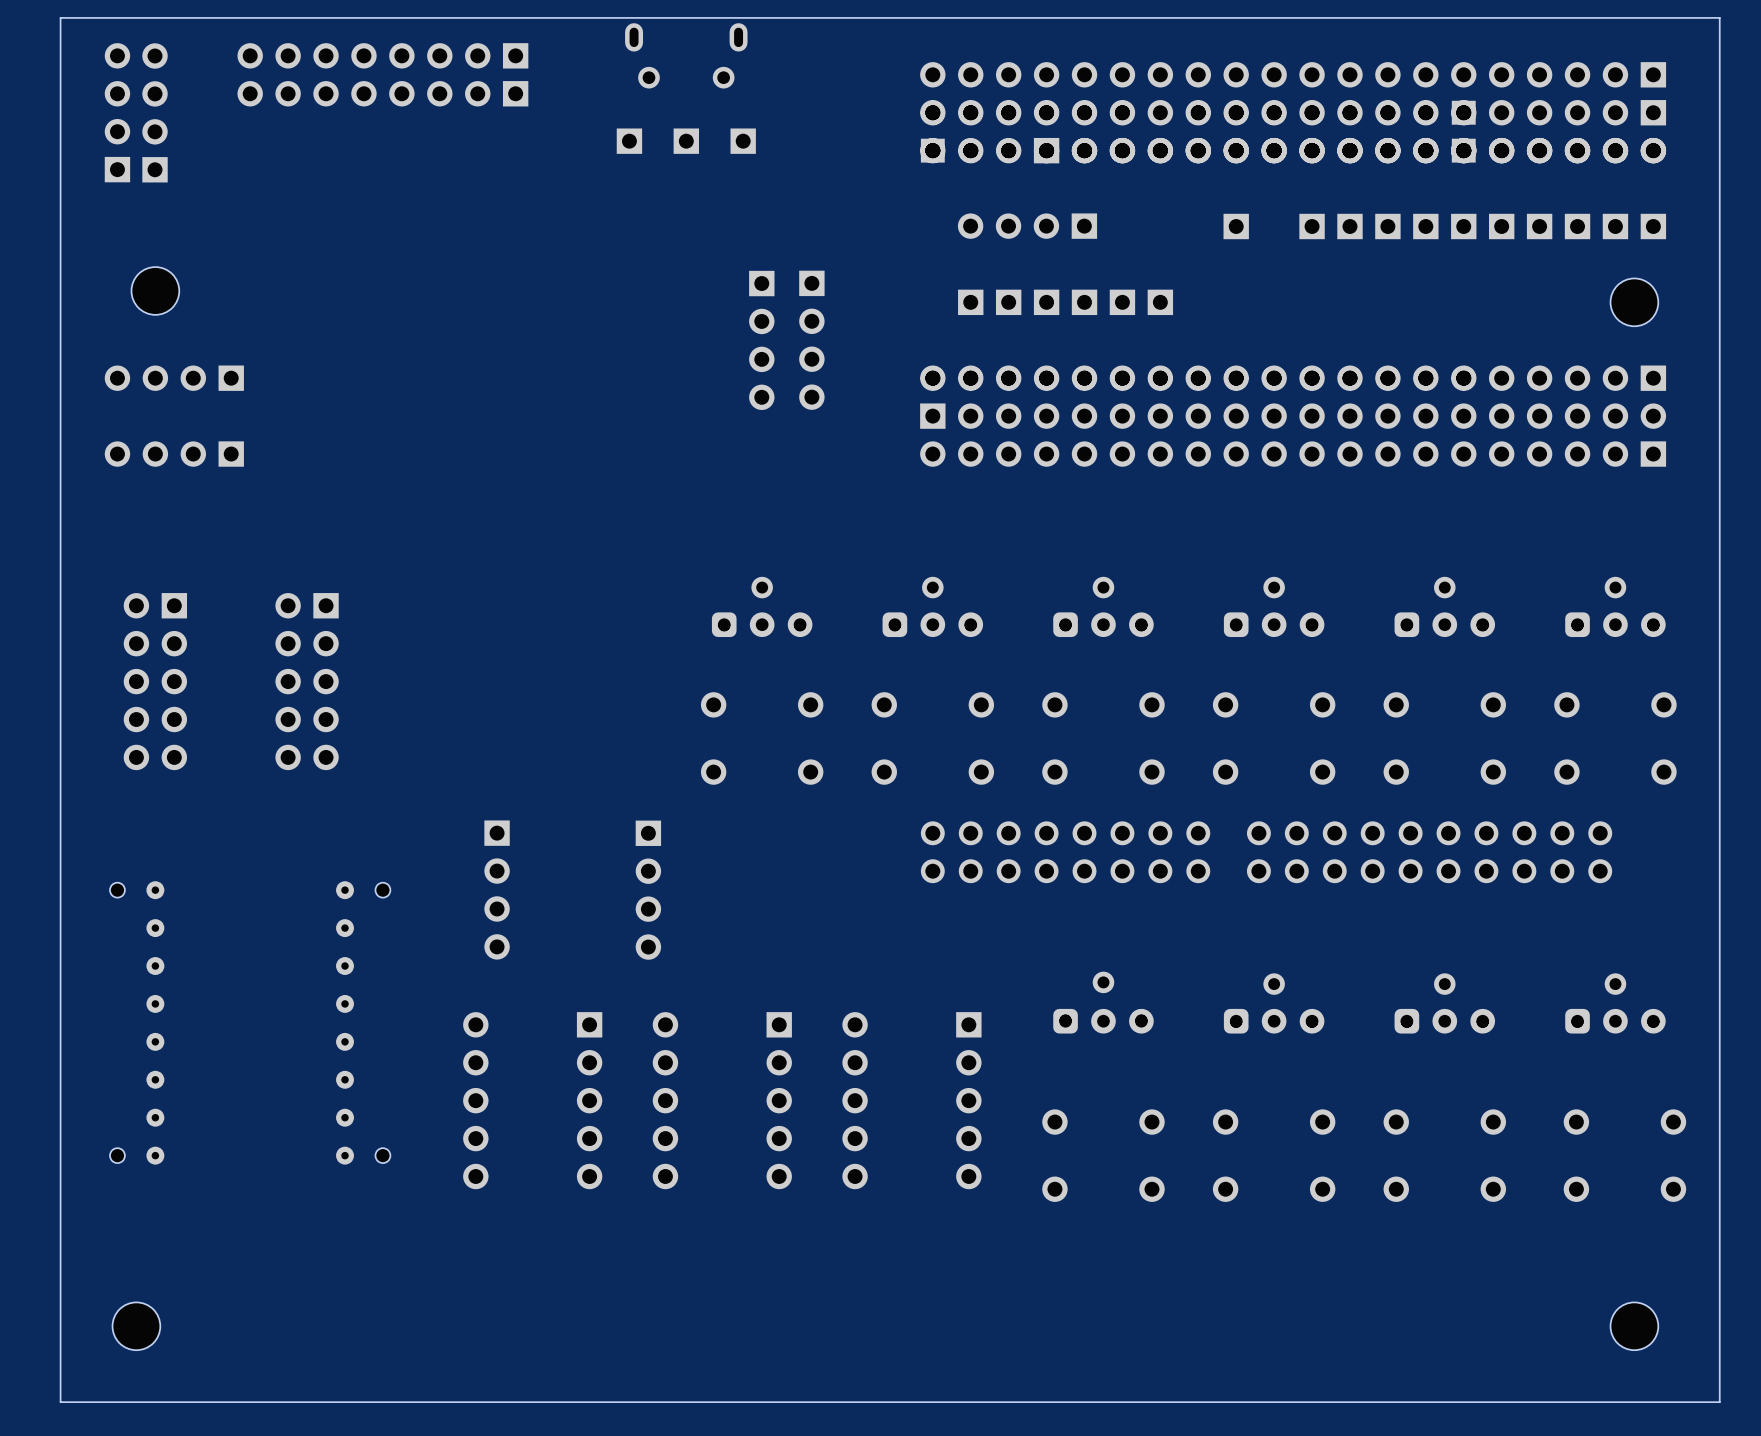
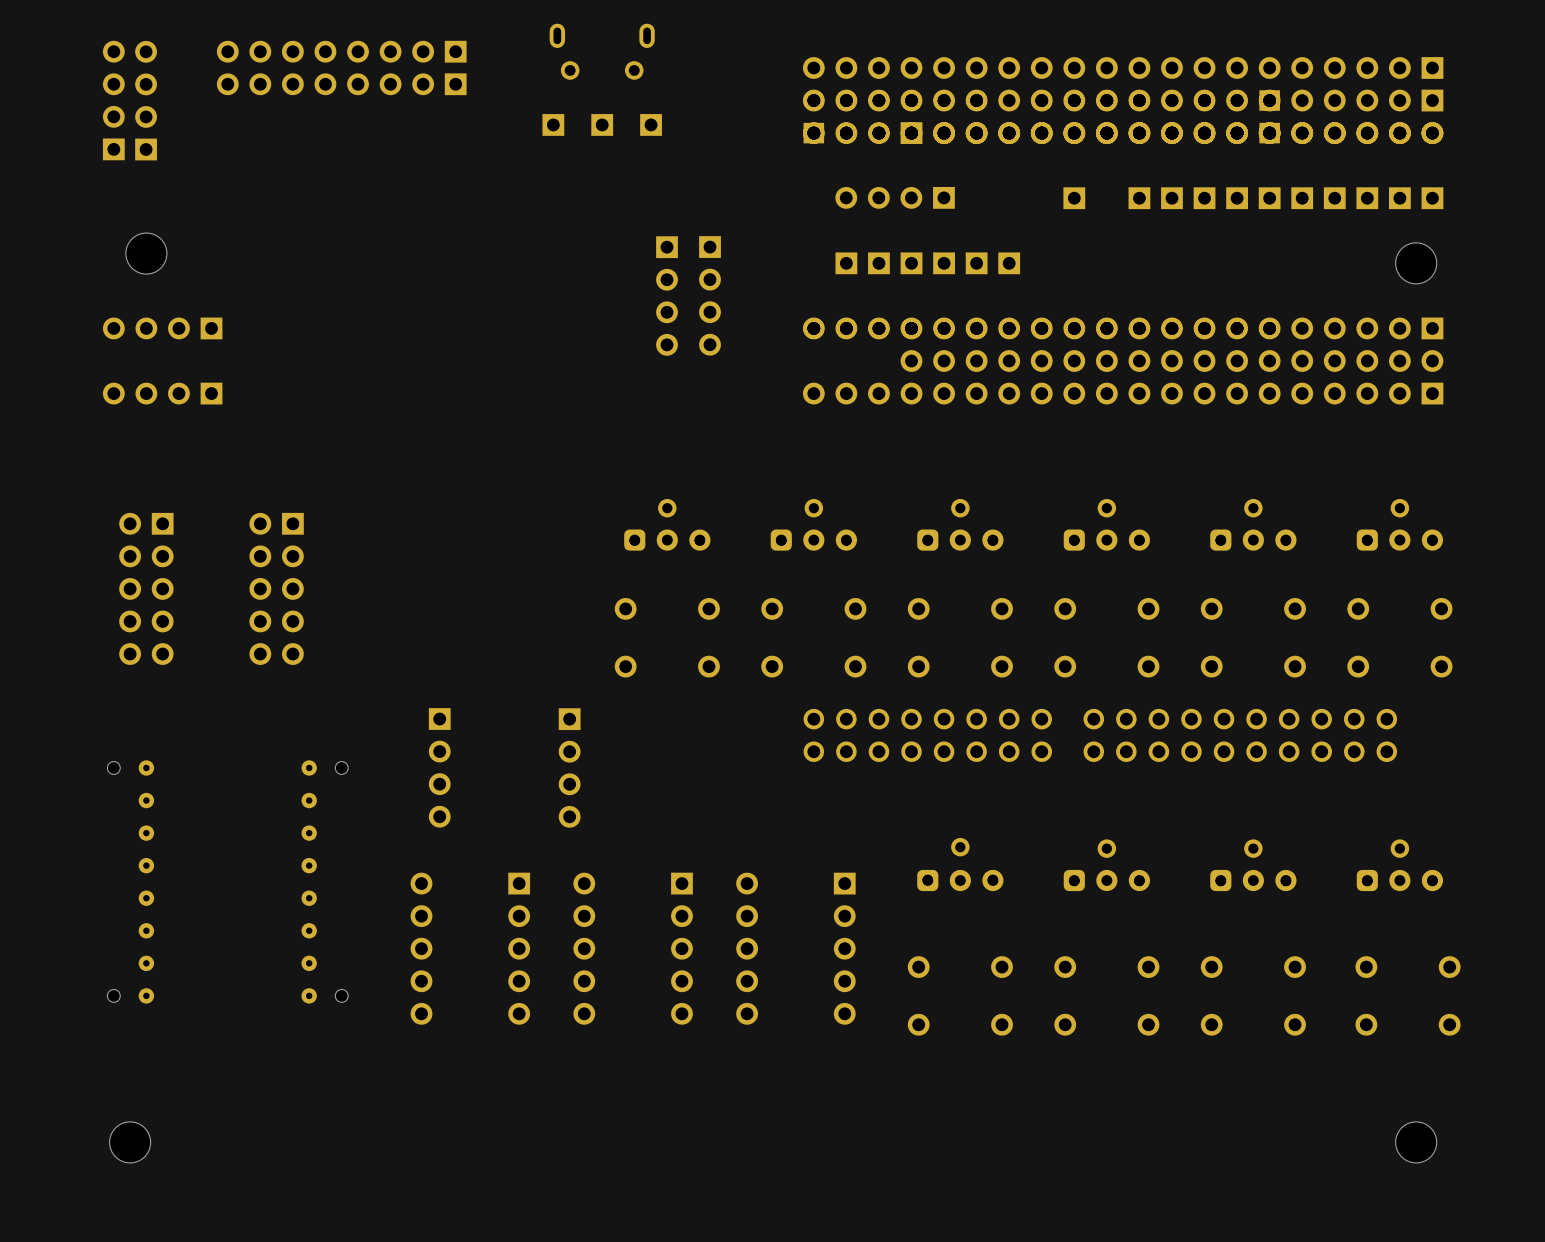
board edge: (1719, 17) (60, 17) (60, 1402) (1719, 1402) (1719, 17) -> none
part: (970, 416) -> none

